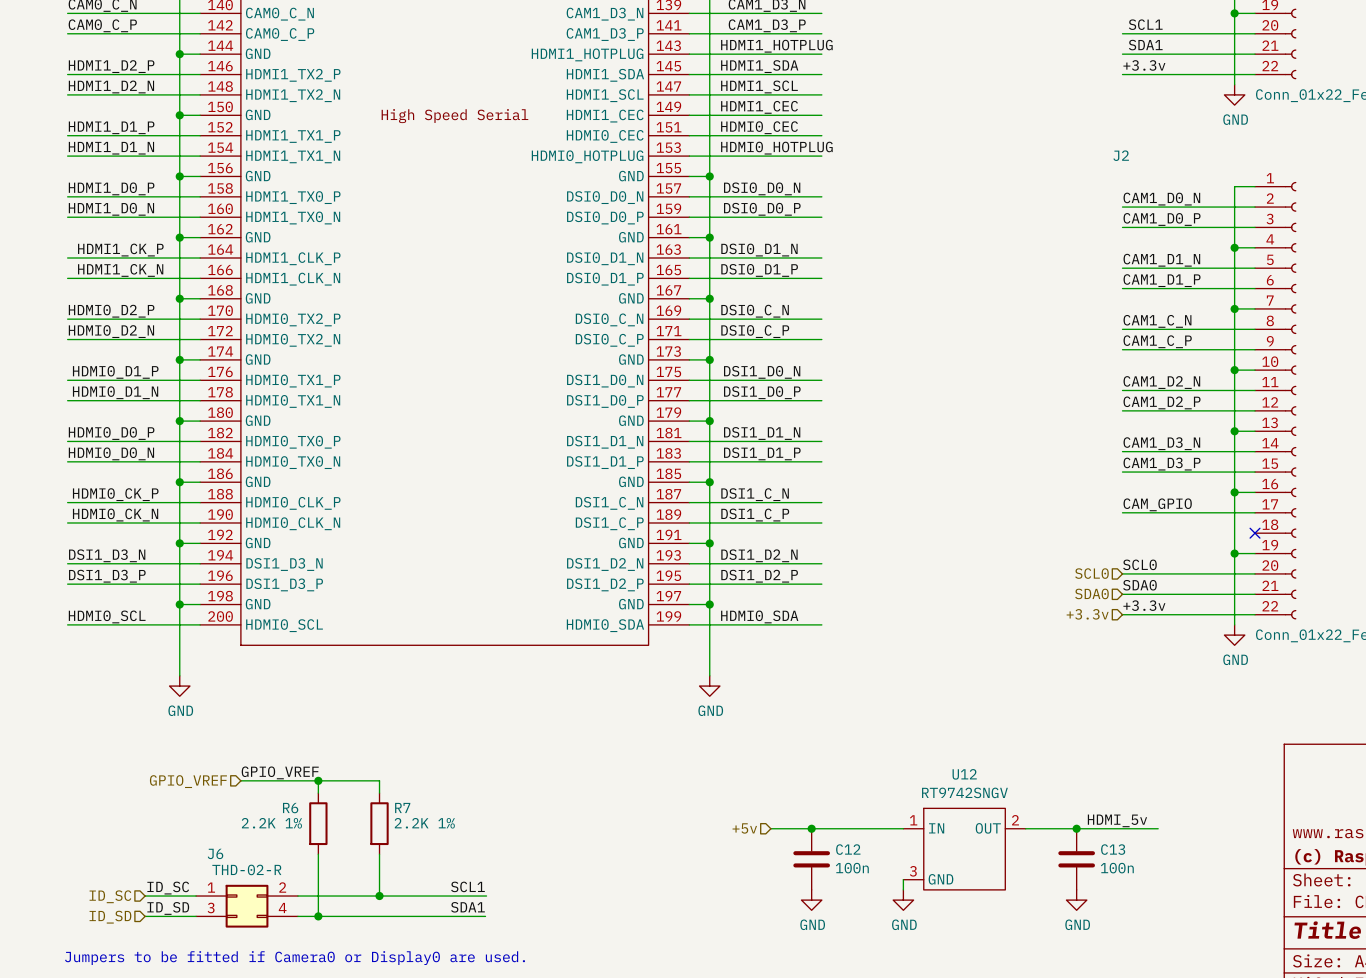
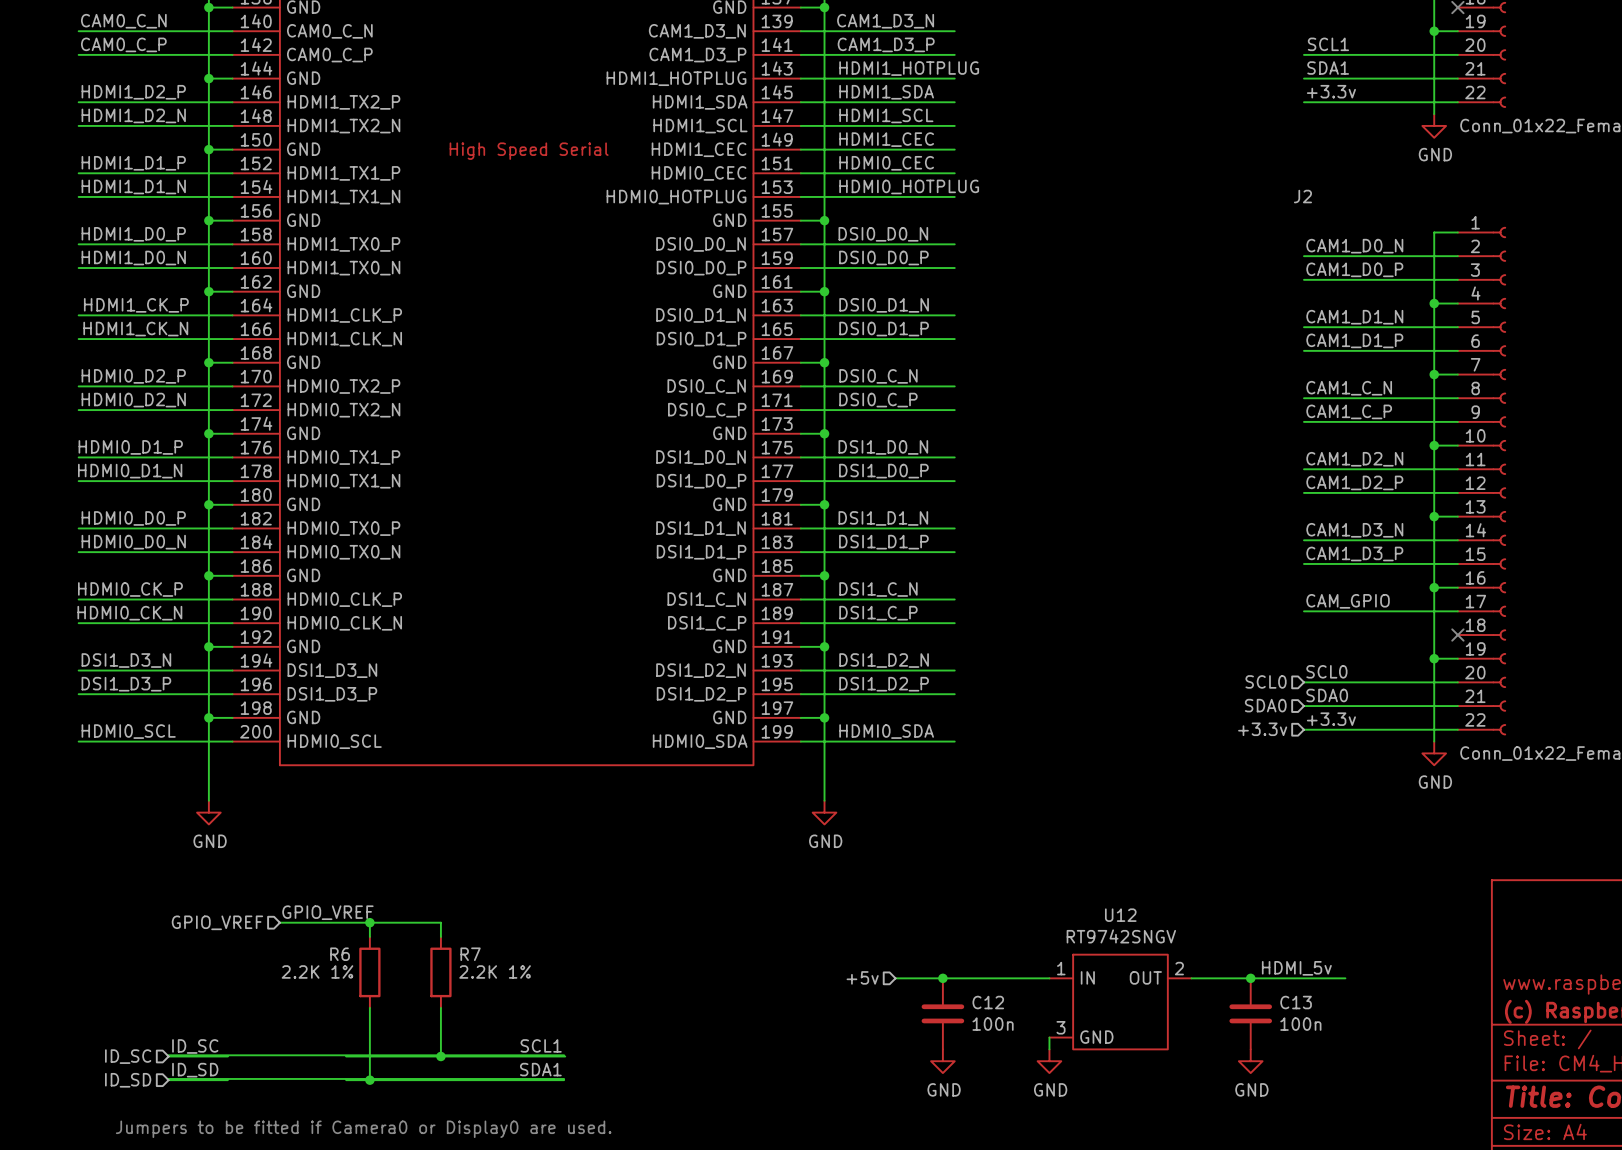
wire: none -> (167, 1055) (564, 1055)
J6: THD-02-R (247, 906) -> none
wire: none -> (167, 1078) (564, 1078)

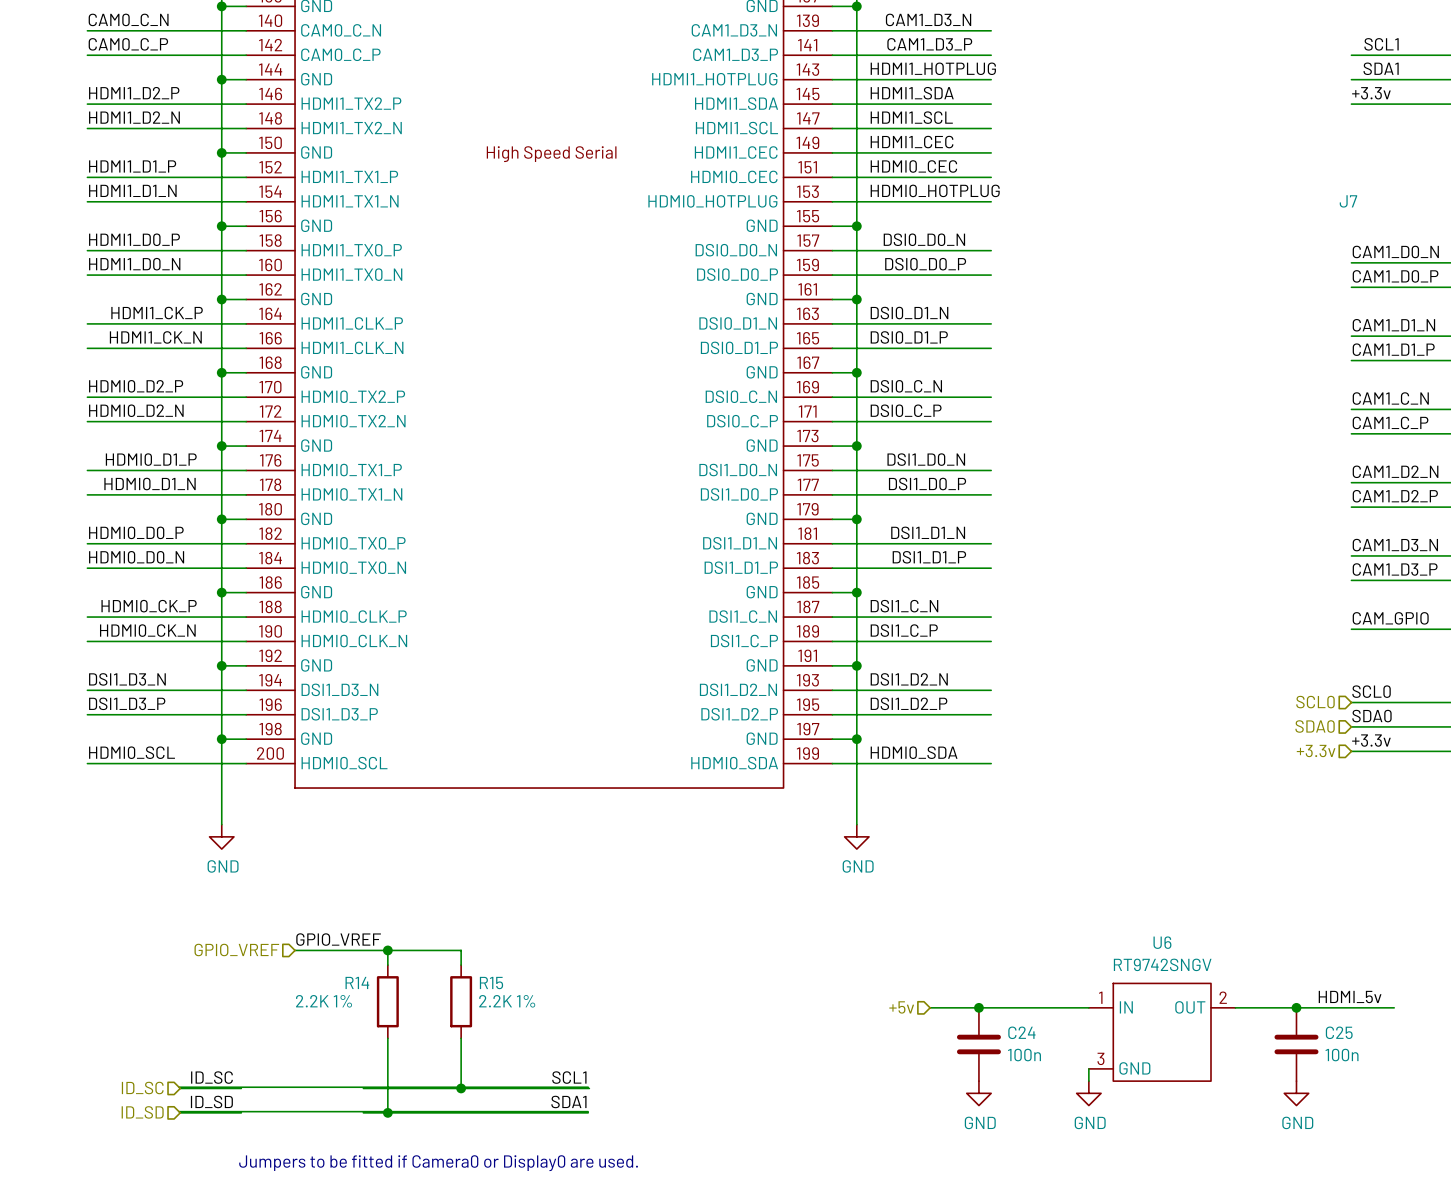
J2 name: J2 (1302, 196) -> J7 (1348, 201)
U12 name: U12 (1120, 915) -> U6 (1162, 942)
R6 name: R6 (340, 954) -> R14 (357, 982)
R7 name: R7 (470, 954) -> R15 (491, 983)
C12 name: C12 (988, 1002) -> C24 (1021, 1032)
C13 name: C13 (1296, 1002) -> C25 (1339, 1032)

